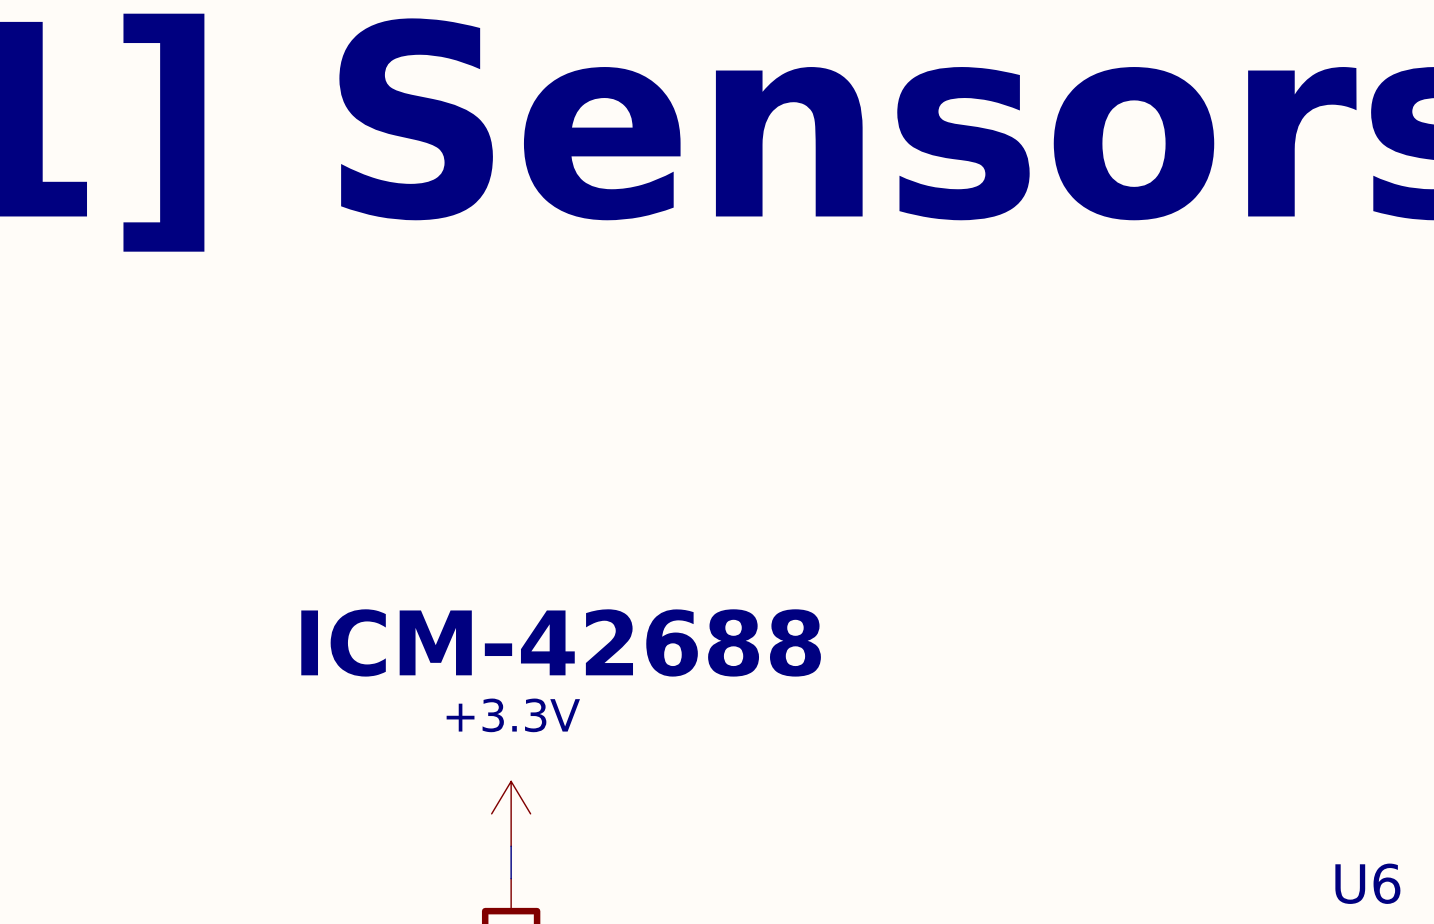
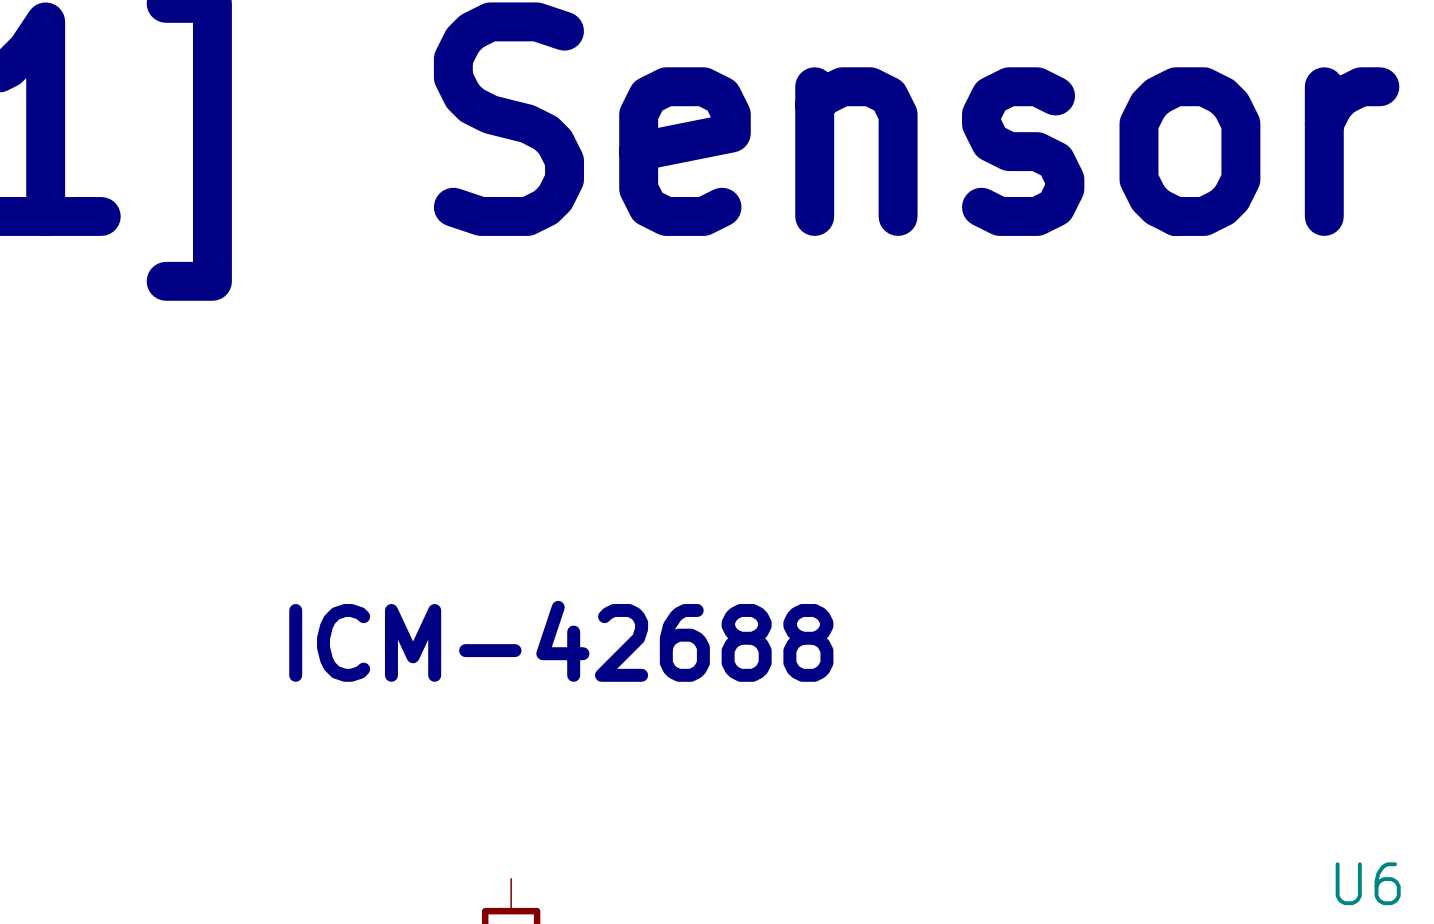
power symbol: +3.3V (511, 813) -> none
wire: (511, 846) (511, 878) -> none

